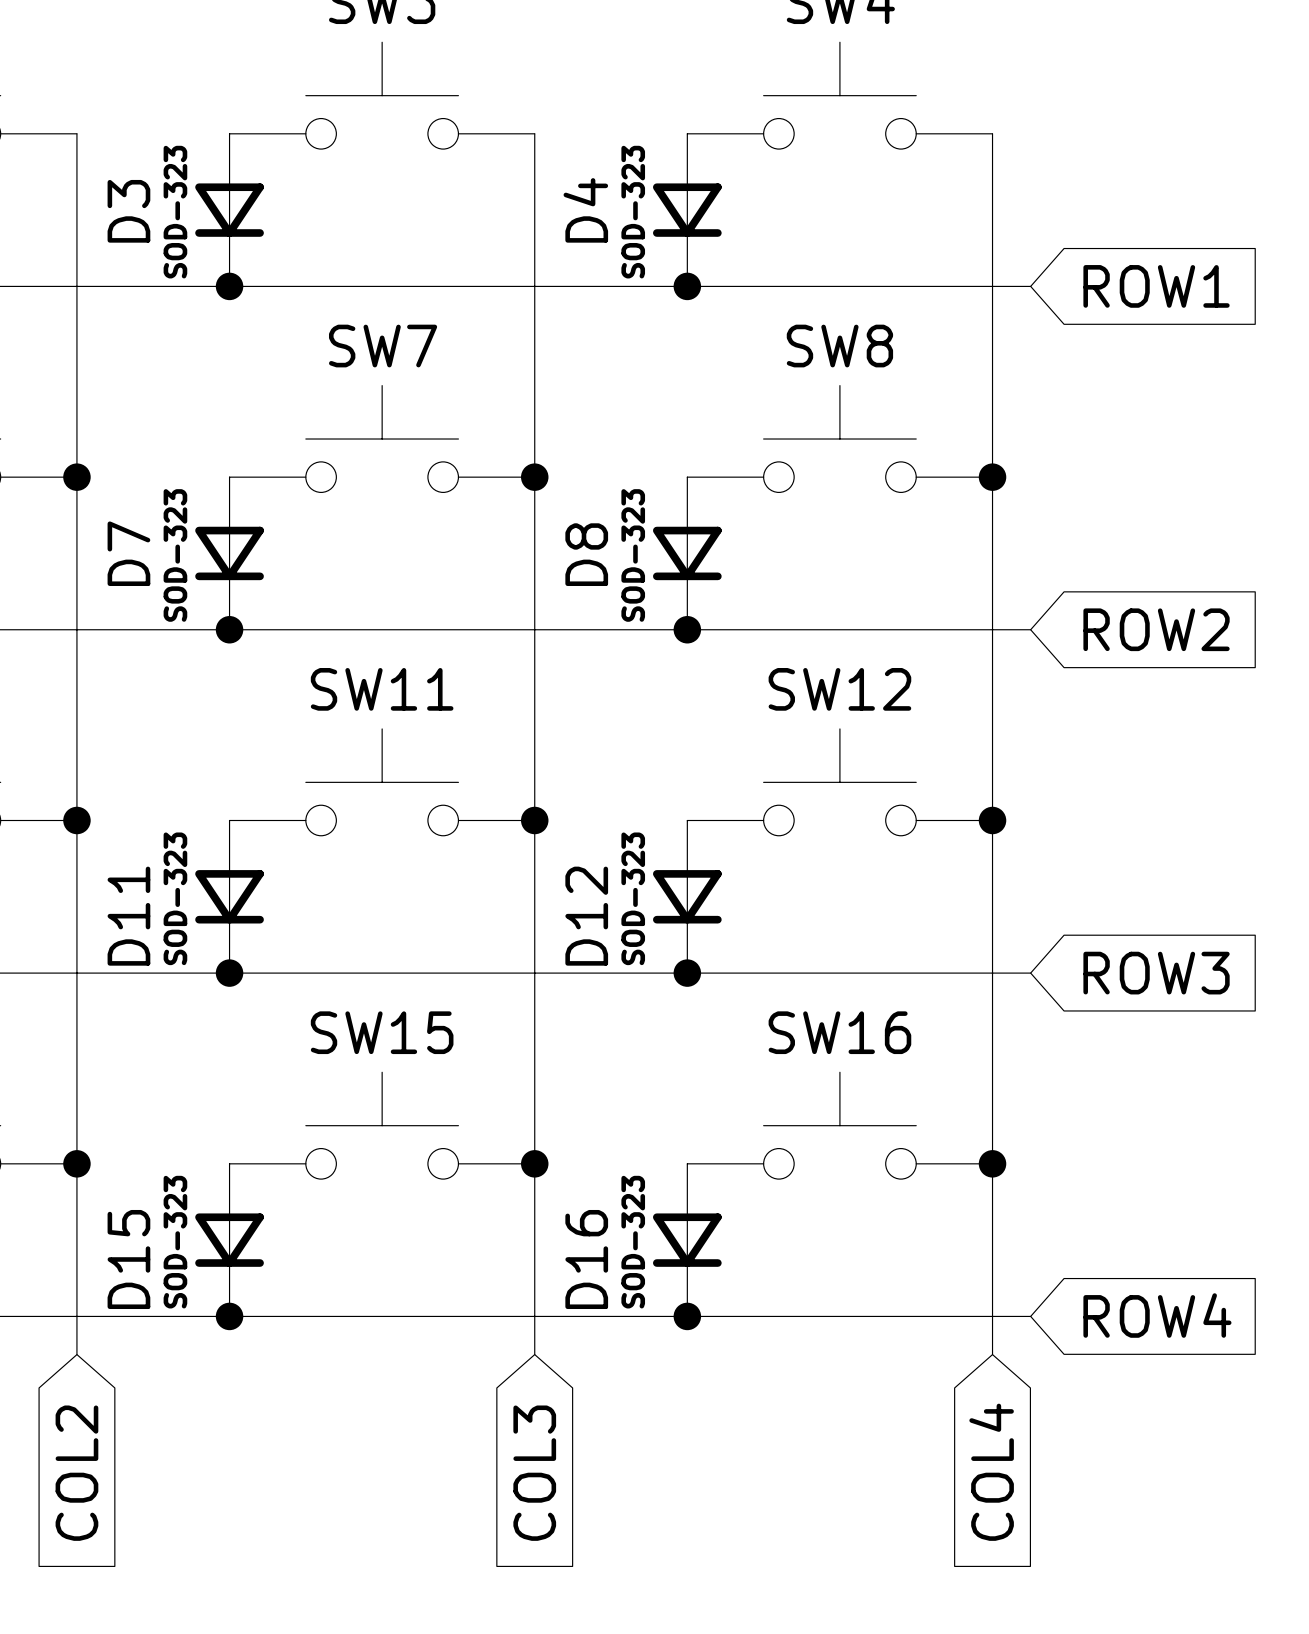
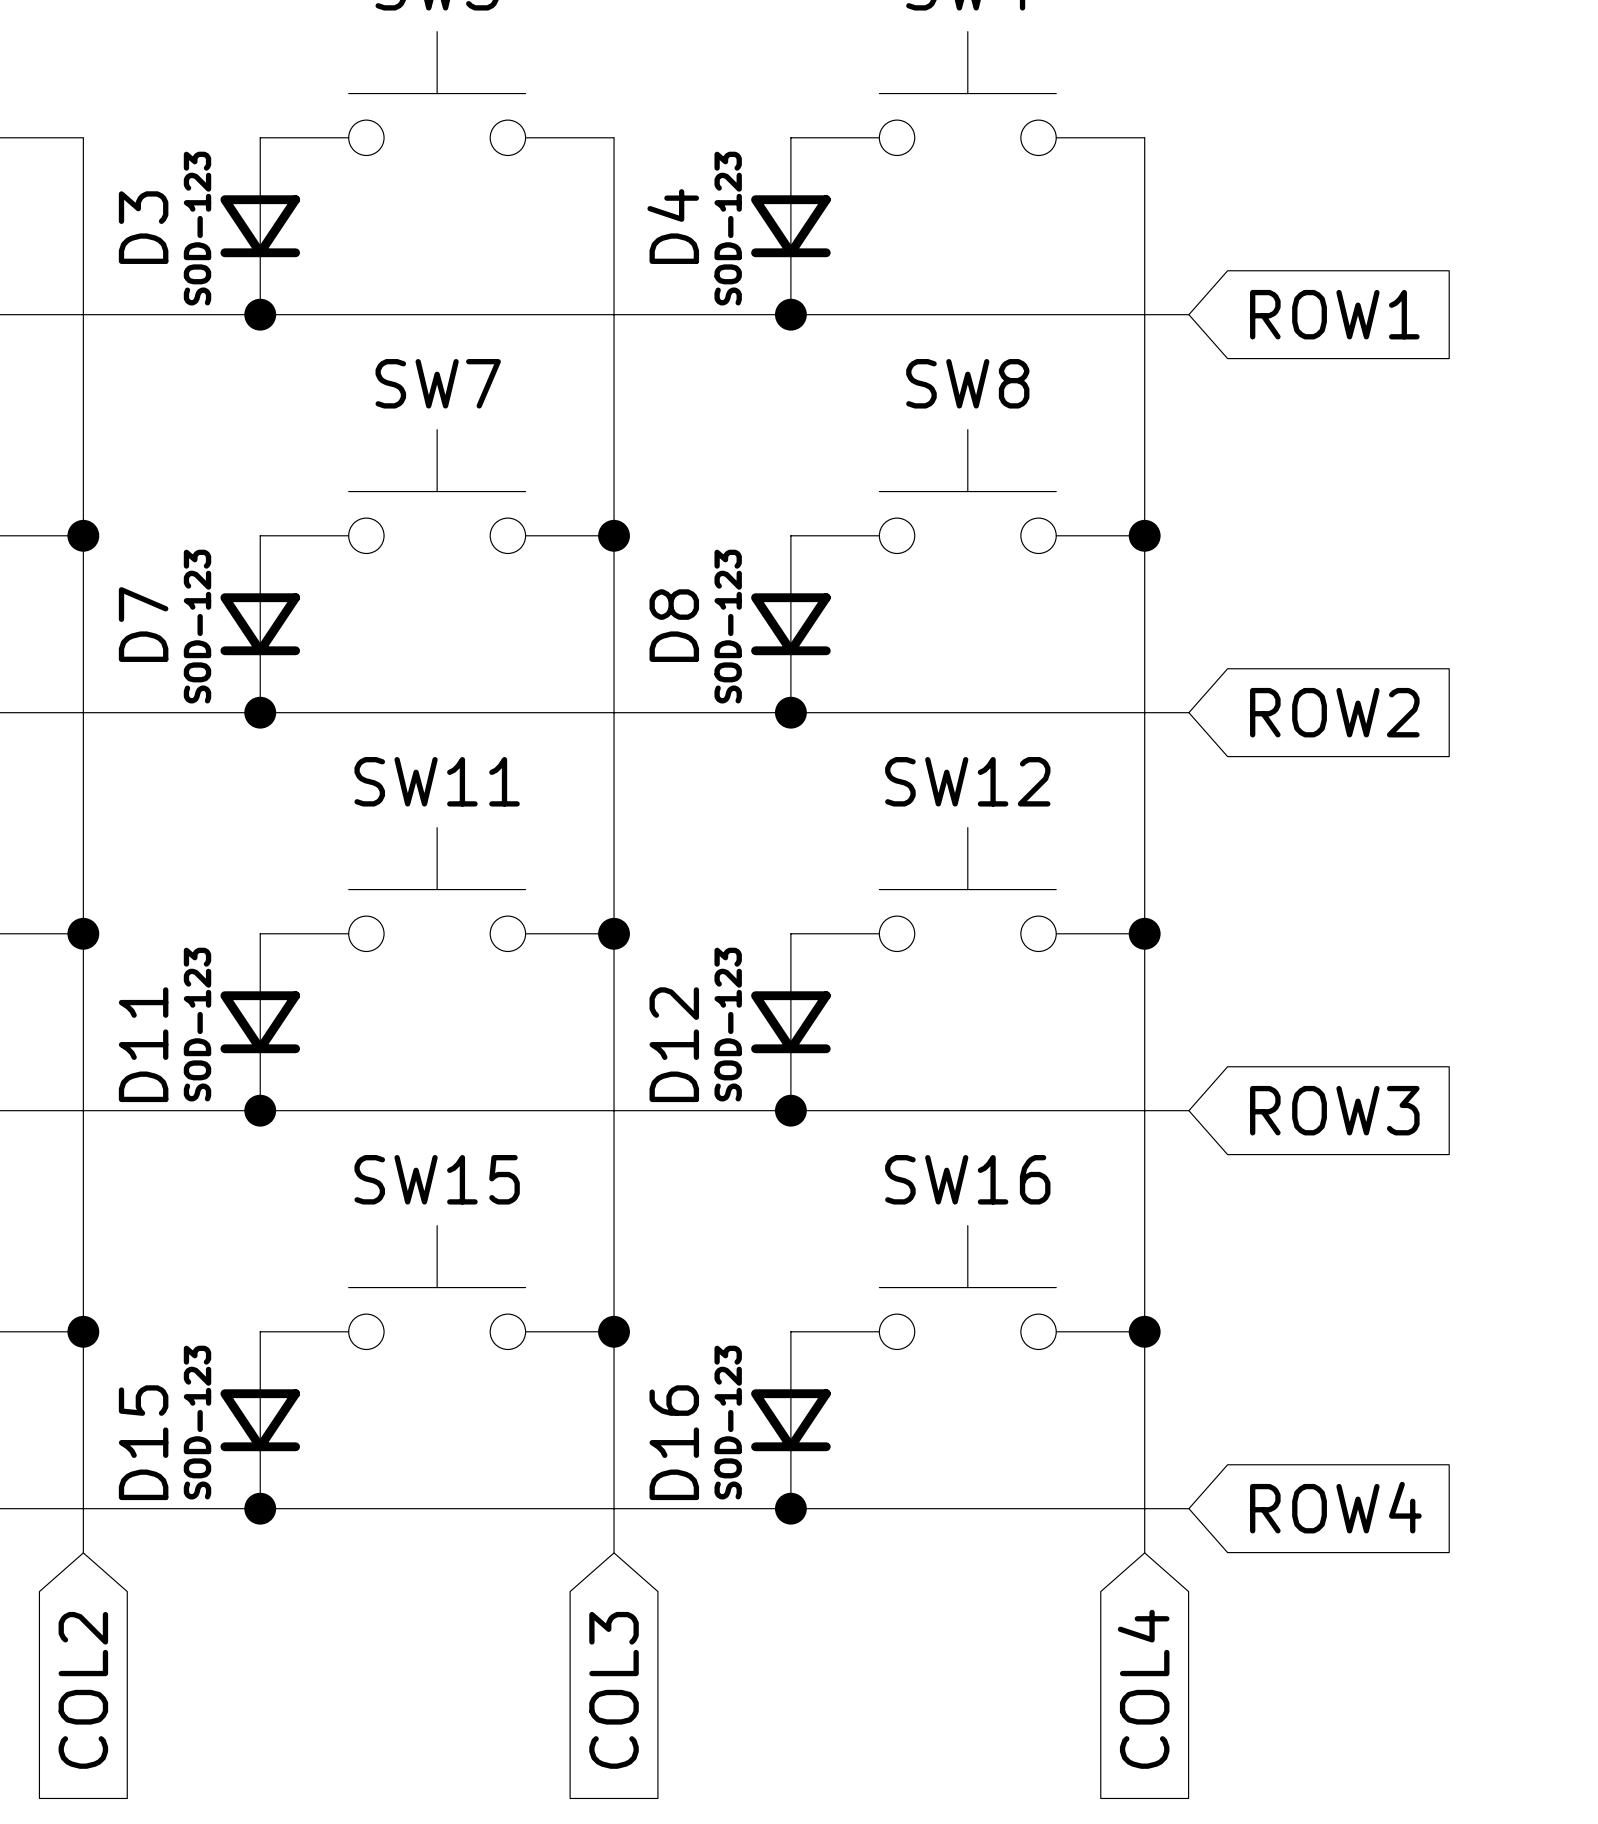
D3 value: SOD-323 (175, 212) -> SOD-123 (197, 228)
D4 value: SOD-323 (633, 212) -> SOD-123 (728, 228)
D7 value: SOD-323 (175, 555) -> SOD-123 (197, 626)
D8 value: SOD-323 (633, 555) -> SOD-123 (728, 626)
D11 value: SOD-323 (175, 898) -> SOD-123 (197, 1024)
D12 value: SOD-323 (633, 898) -> SOD-123 (728, 1024)
D15 value: SOD-323 (175, 1242) -> SOD-123 (197, 1422)
D16 value: SOD-323 (633, 1242) -> SOD-123 (728, 1422)

